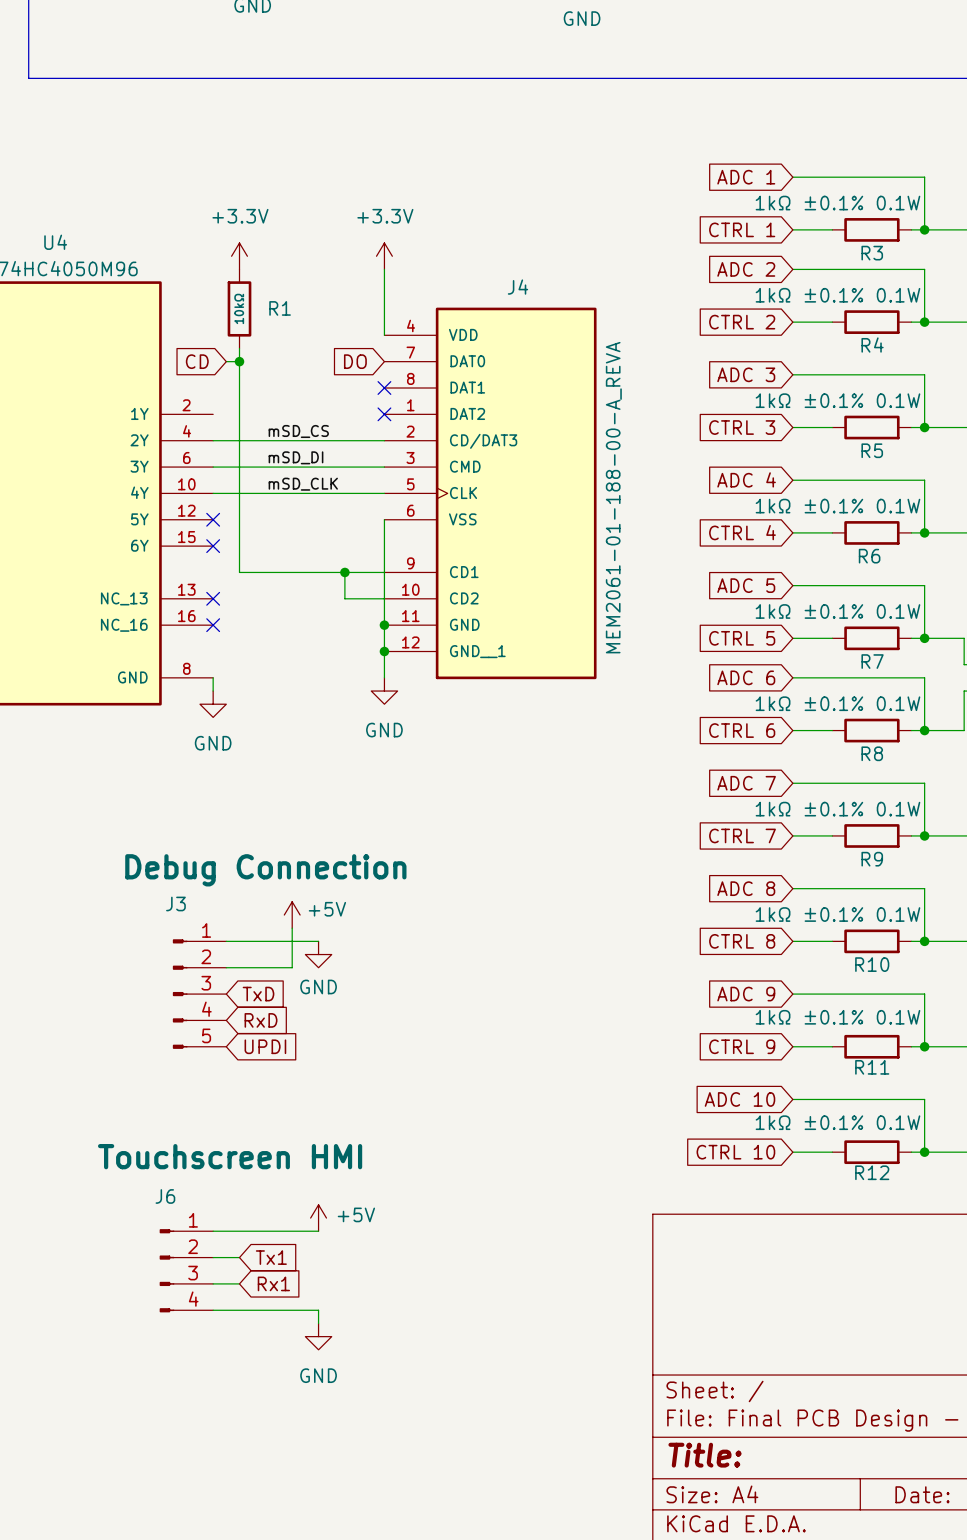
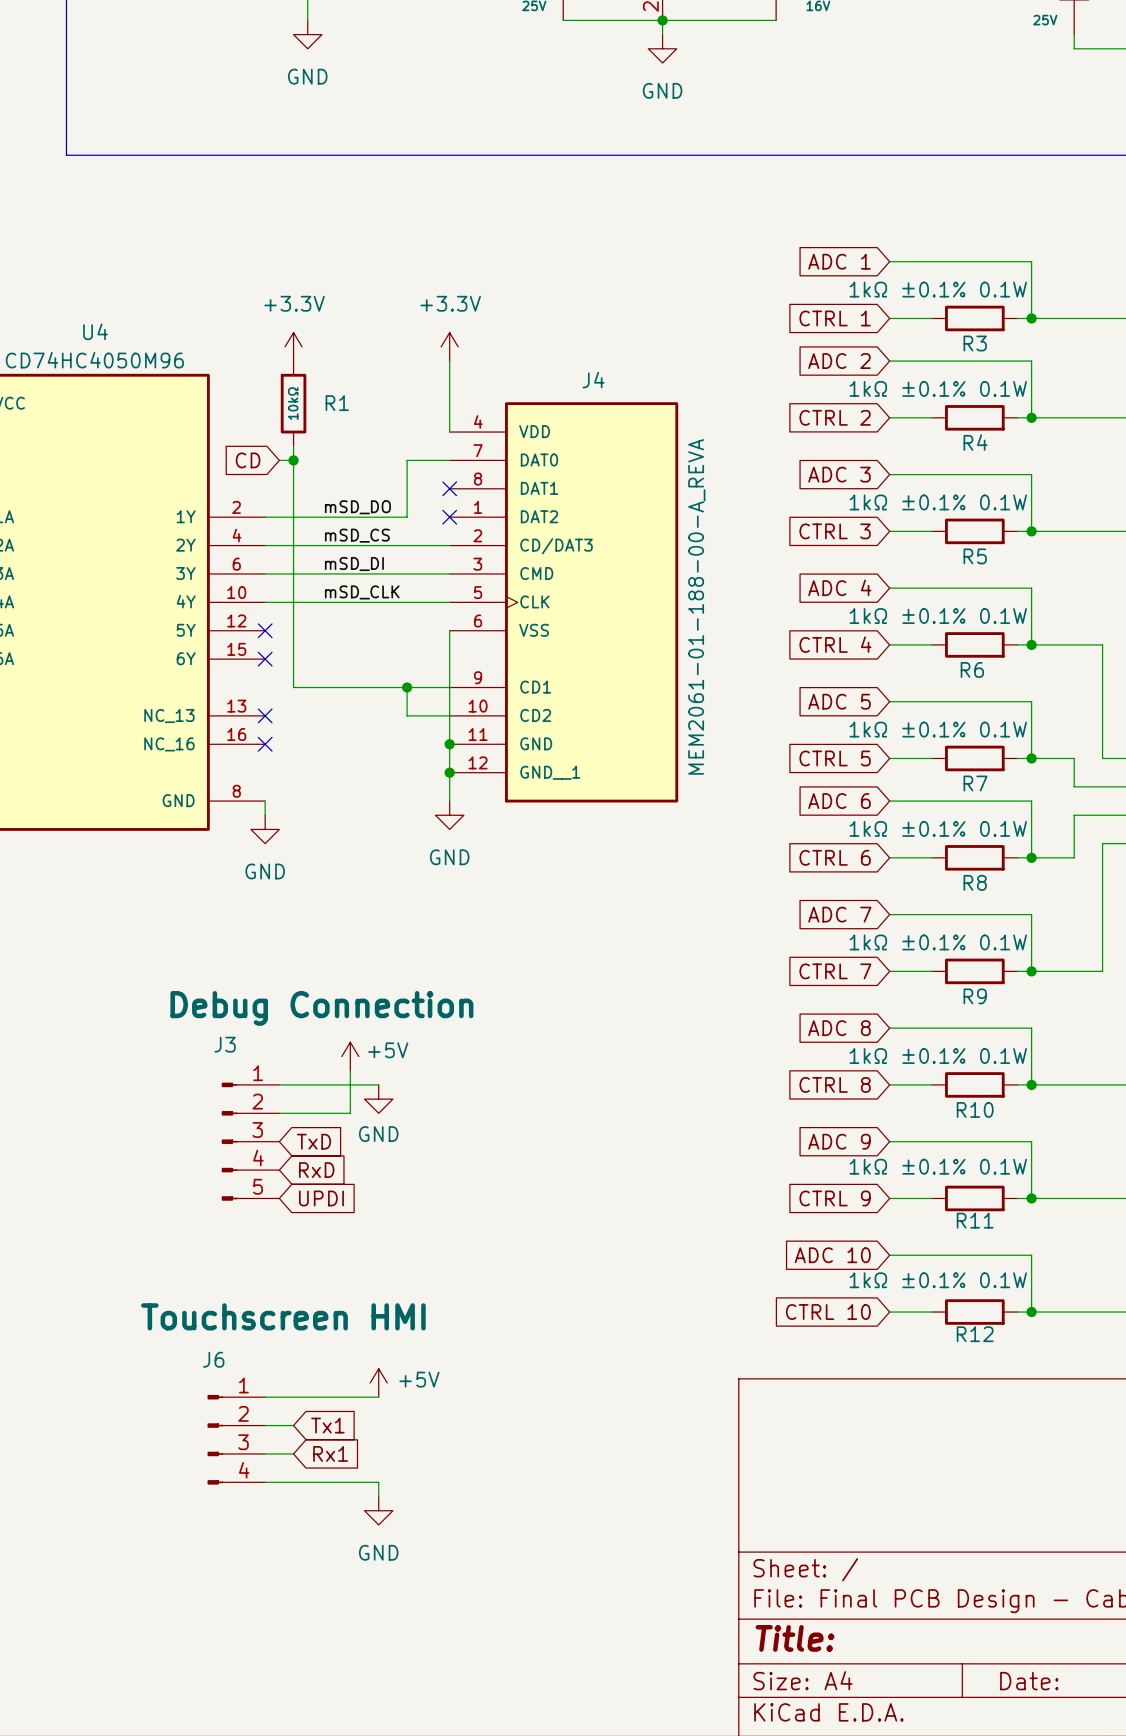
global label: DO (355, 361) -> none
wire: none -> (449, 460) (407, 460) (407, 517) (265, 517)
label: none -> mSD_DO (357, 507)

